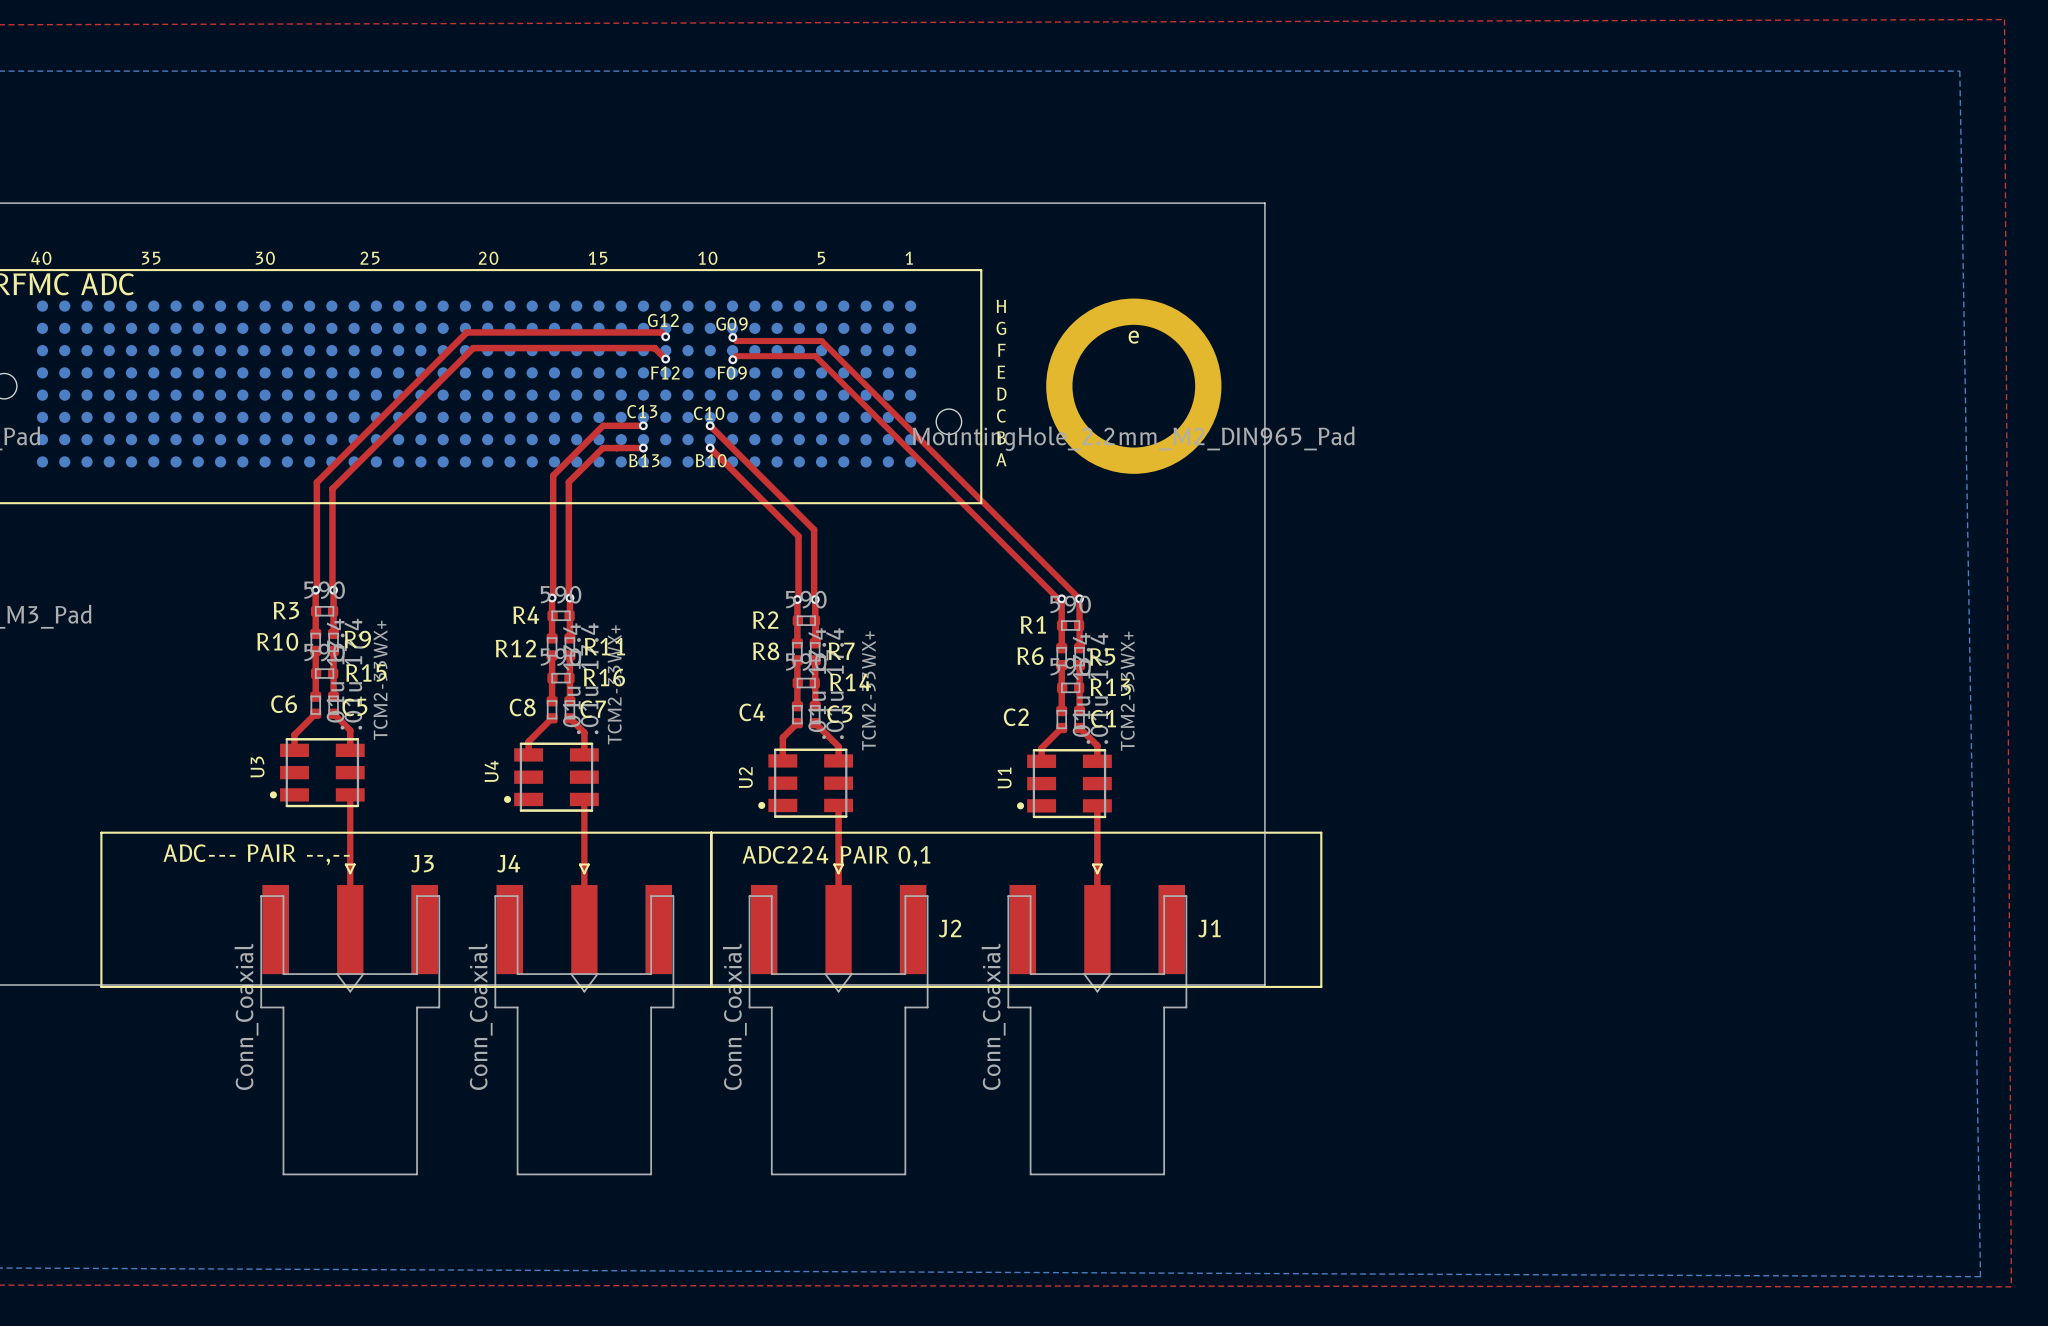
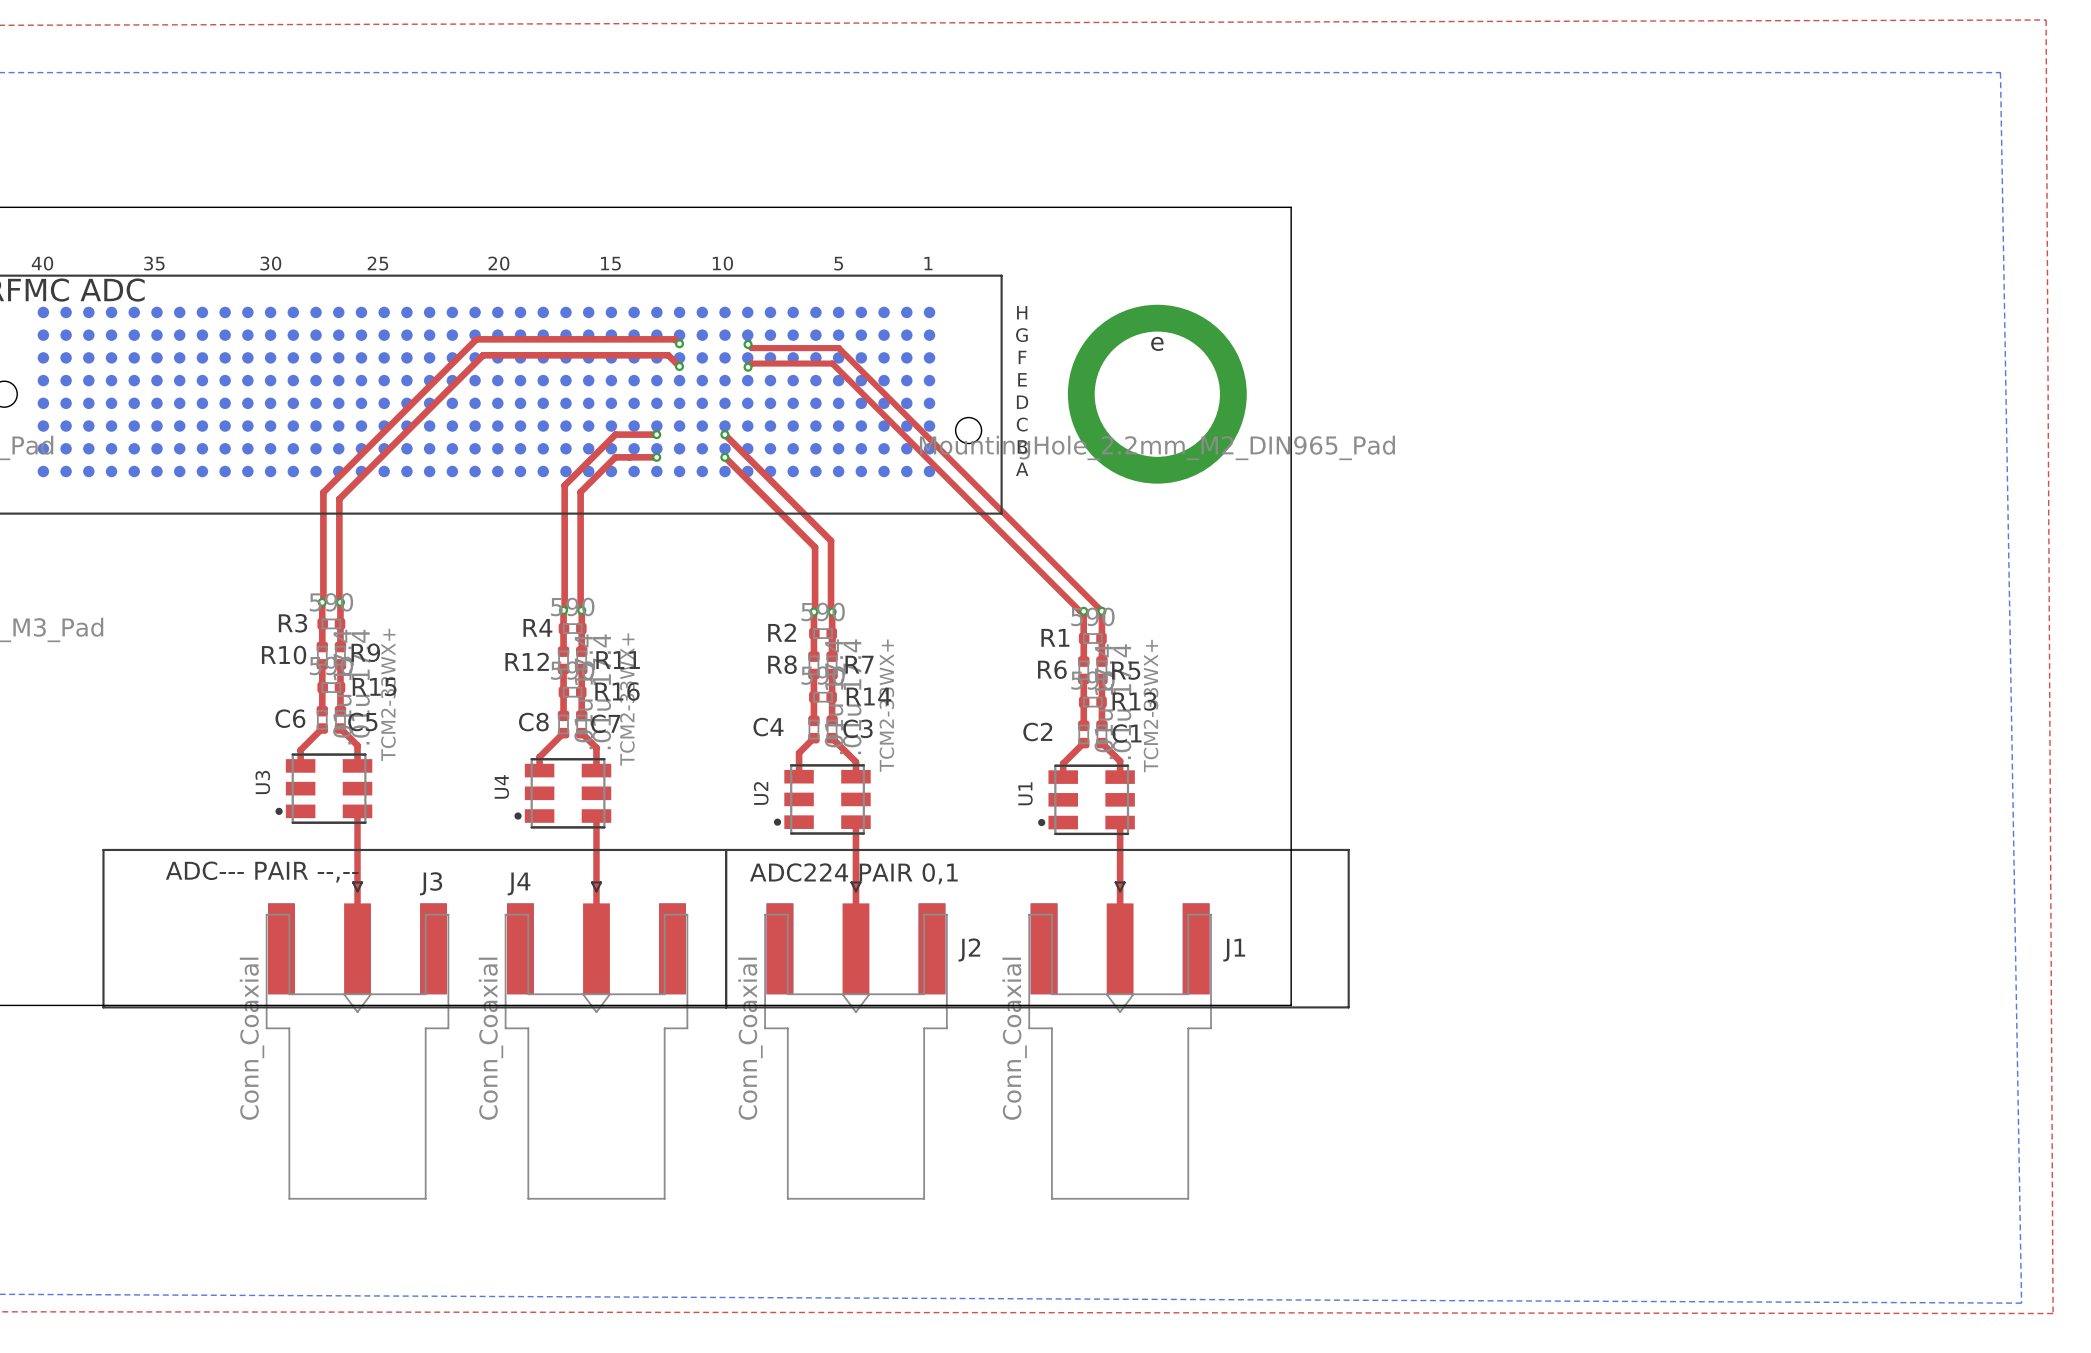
text: G12 (663, 320) -> none
text: G09 (731, 323) -> none
text: F12 (665, 372) -> none
text: F09 (732, 373) -> none
text: C13 (642, 411) -> none
text: C10 (709, 413) -> none
text: B13 (644, 460) -> none
text: B10 (711, 460) -> none

